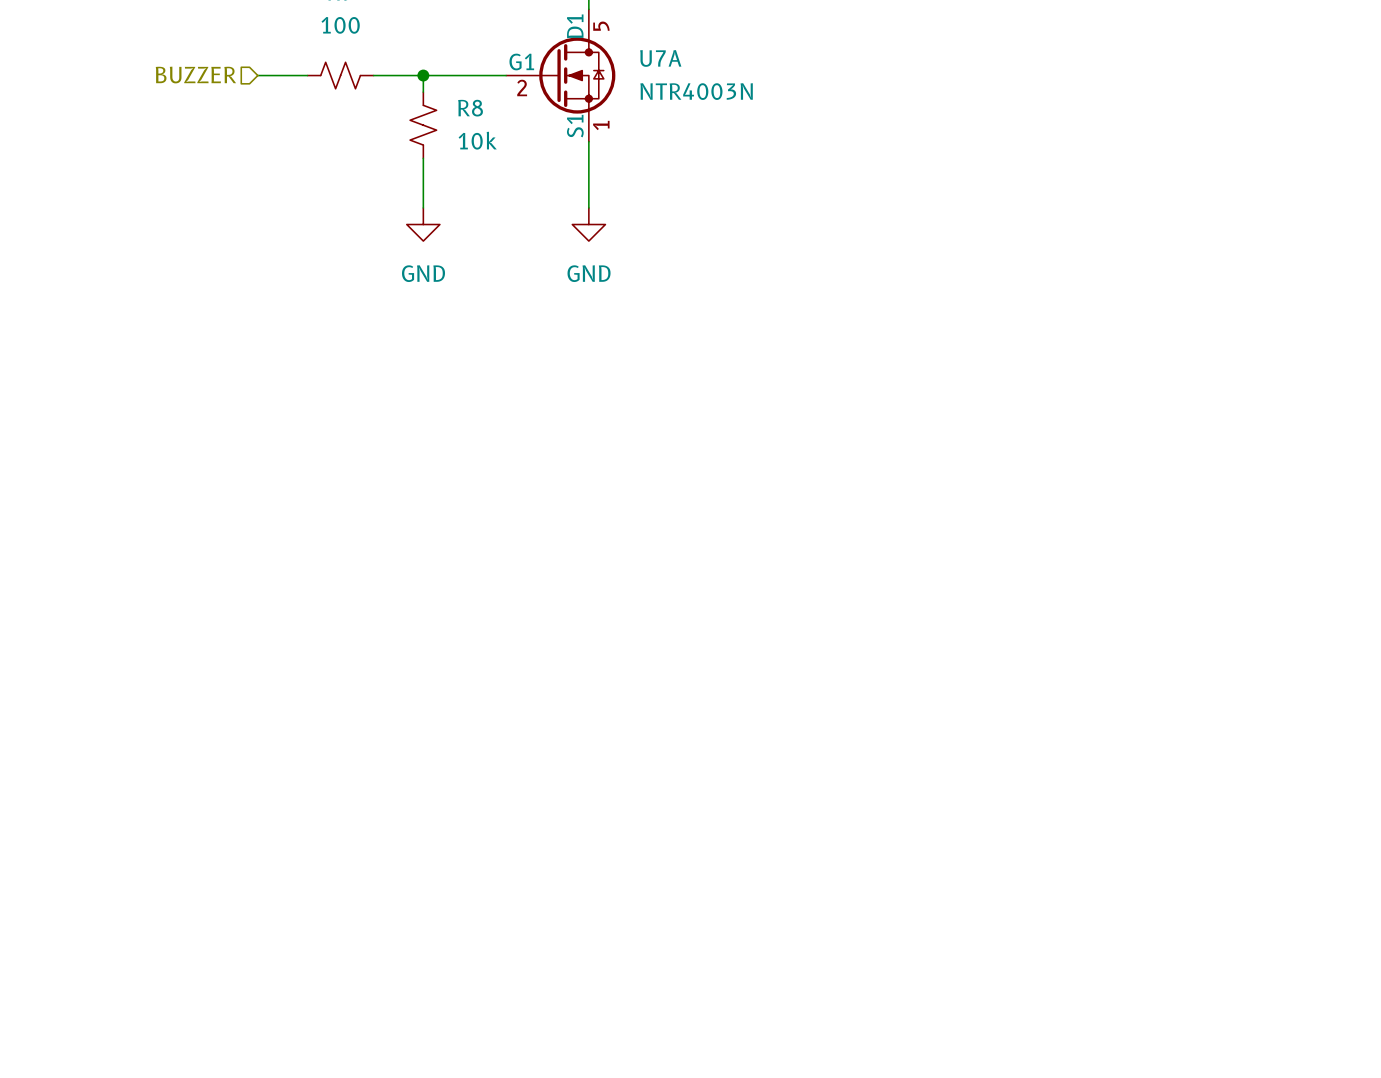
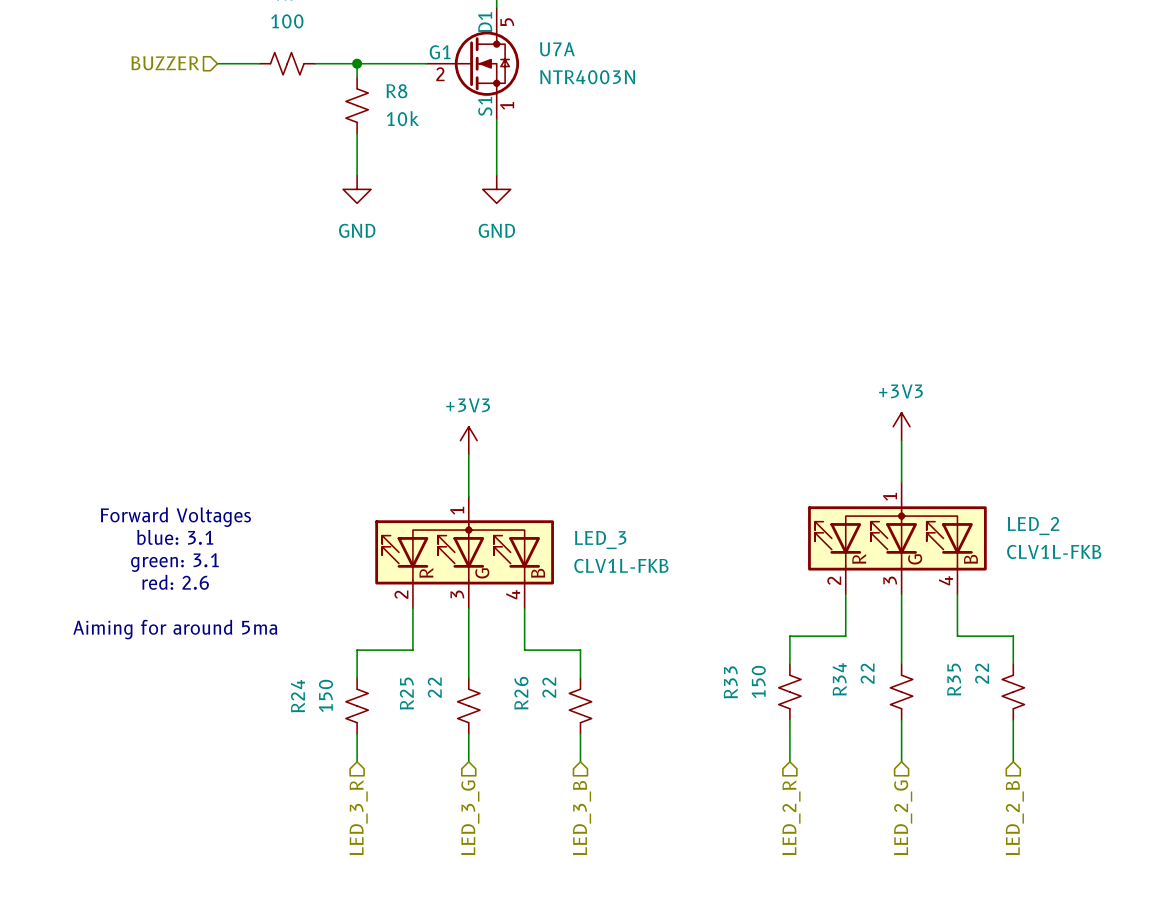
power symbol: none -> +3V3 (901, 426)
power symbol: none -> +3V3 (468, 440)
wire: none -> (901, 440) (901, 482)
wire: none -> (468, 454) (468, 496)
text: none -> Forward Voltages (175, 517)
text: none -> blue: 3.1 (175, 537)
LED_2: none -> CLV1L-FKB (897, 538)
LED_3: none -> CLV1L-FKB (464, 552)
text: none -> green: 3.1 (174, 562)
text: none -> red: 2.6 (175, 582)
wire: none -> (845, 594) (845, 636) (789, 636) (789, 664)
wire: none -> (901, 594) (901, 664)
wire: none -> (957, 594) (957, 636) (1013, 636) (1013, 664)
wire: none -> (412, 608) (412, 650) (357, 650) (357, 678)
wire: none -> (468, 608) (468, 678)
wire: none -> (524, 608) (524, 650) (580, 650) (580, 678)
text: none -> Aiming for around 5ma (175, 629)
R33: none -> 150 (789, 692)
R34: none -> 22 (901, 692)
R35: none -> 22 (1013, 692)
R24: none -> 150 (357, 705)
R25: none -> 22 (468, 705)
R26: none -> 22 (580, 705)
wire: none -> (789, 719) (789, 761)
wire: none -> (901, 719) (901, 761)
wire: none -> (1013, 719) (1013, 761)
wire: none -> (357, 733) (357, 761)
wire: none -> (468, 733) (468, 761)
wire: none -> (580, 733) (580, 761)
hierarchical label: none -> LED_3_R (358, 817)
hierarchical label: none -> LED_3_G (470, 817)
hierarchical label: none -> LED_3_B (582, 818)
hierarchical label: none -> LED_2_R (791, 817)
hierarchical label: none -> LED_2_G (903, 817)
hierarchical label: none -> LED_2_B (1014, 818)

